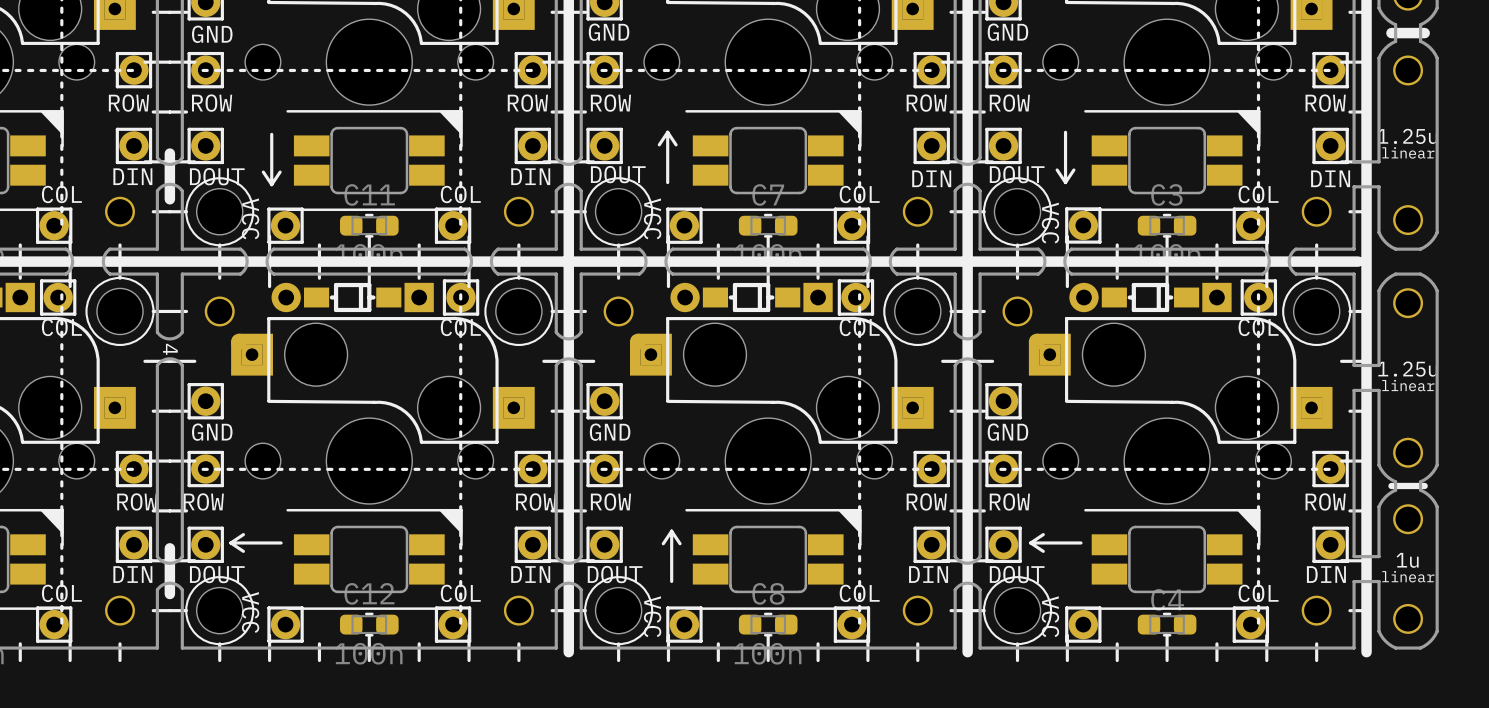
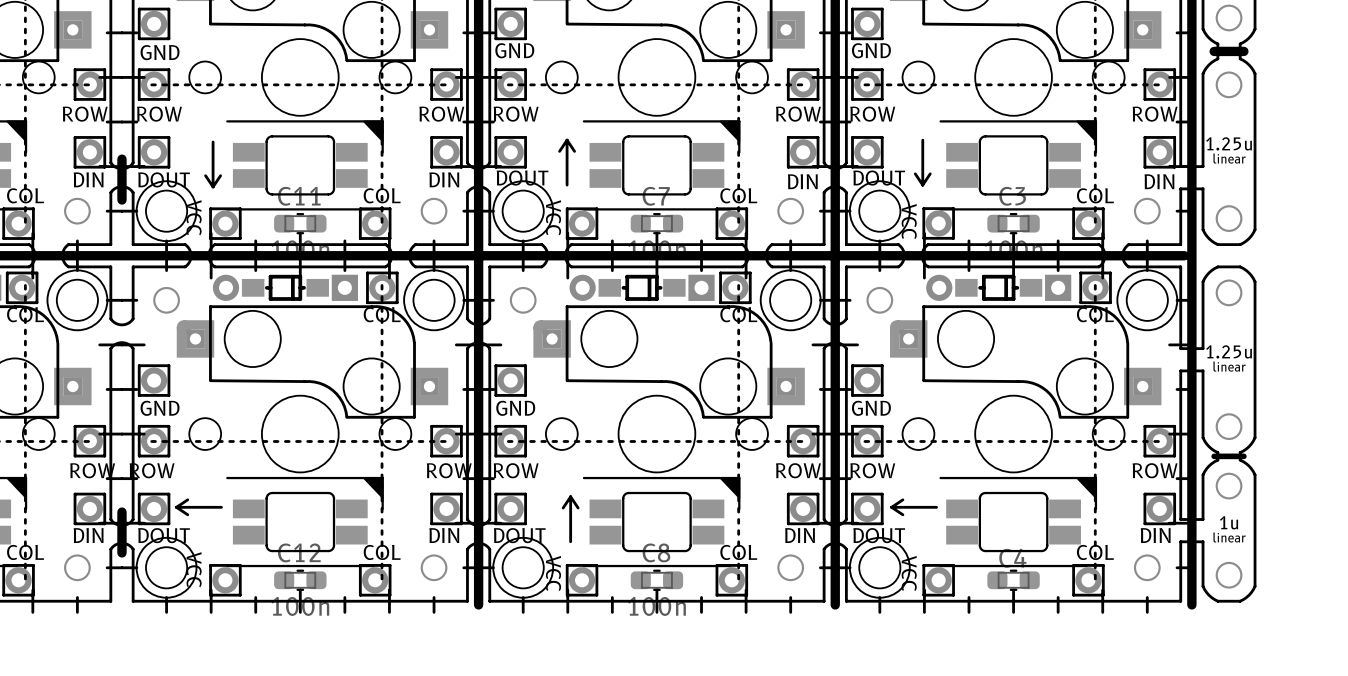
text: 4 (170, 349) -> none

